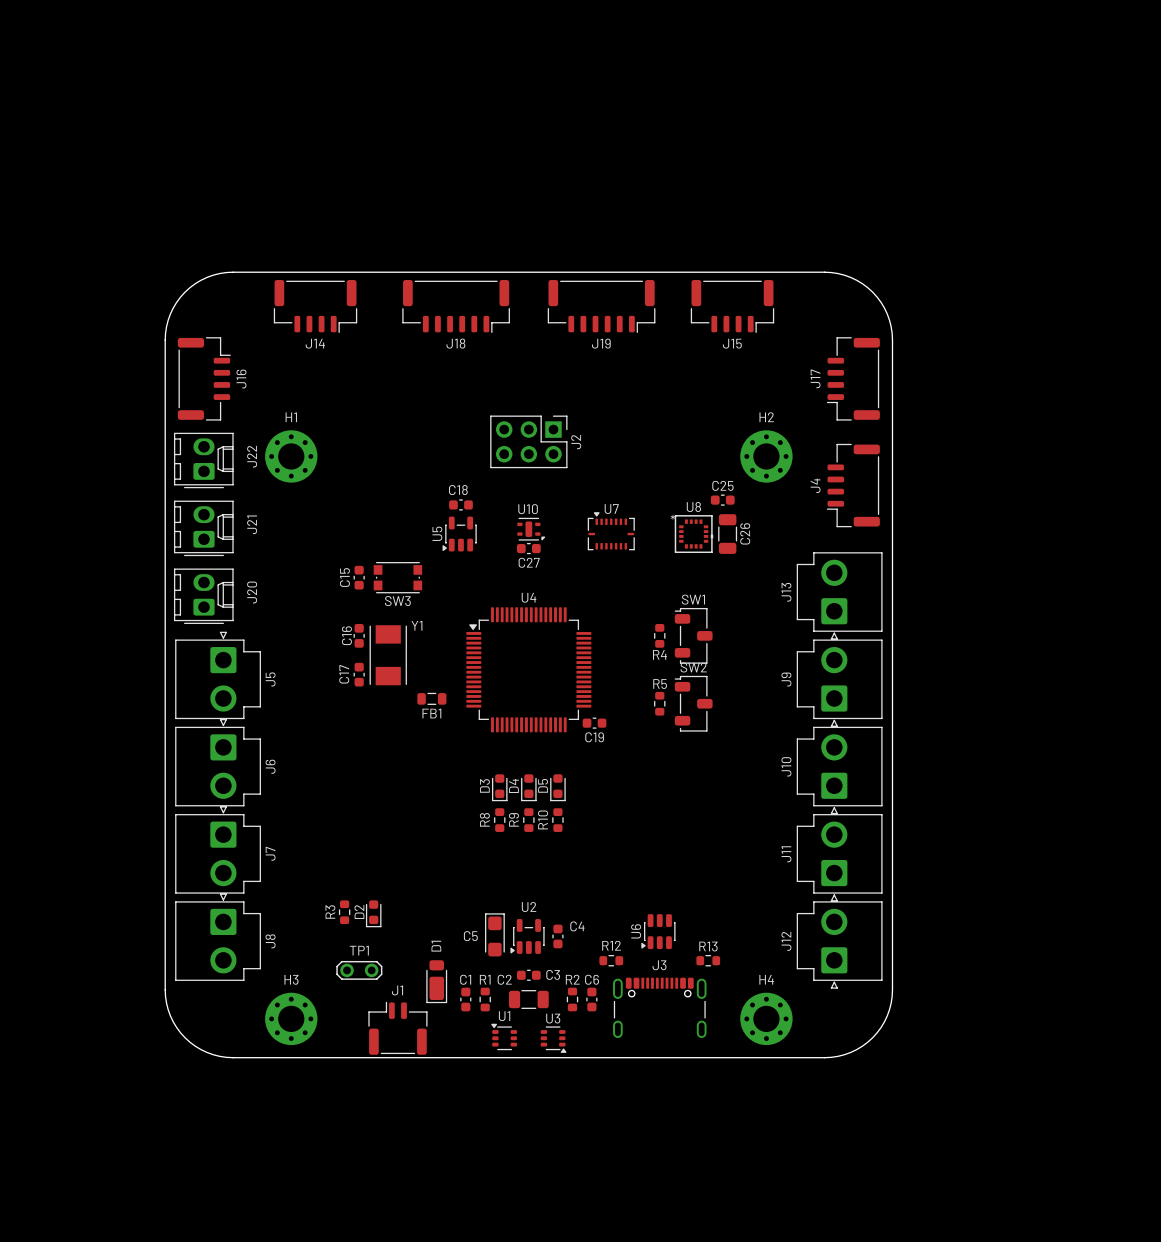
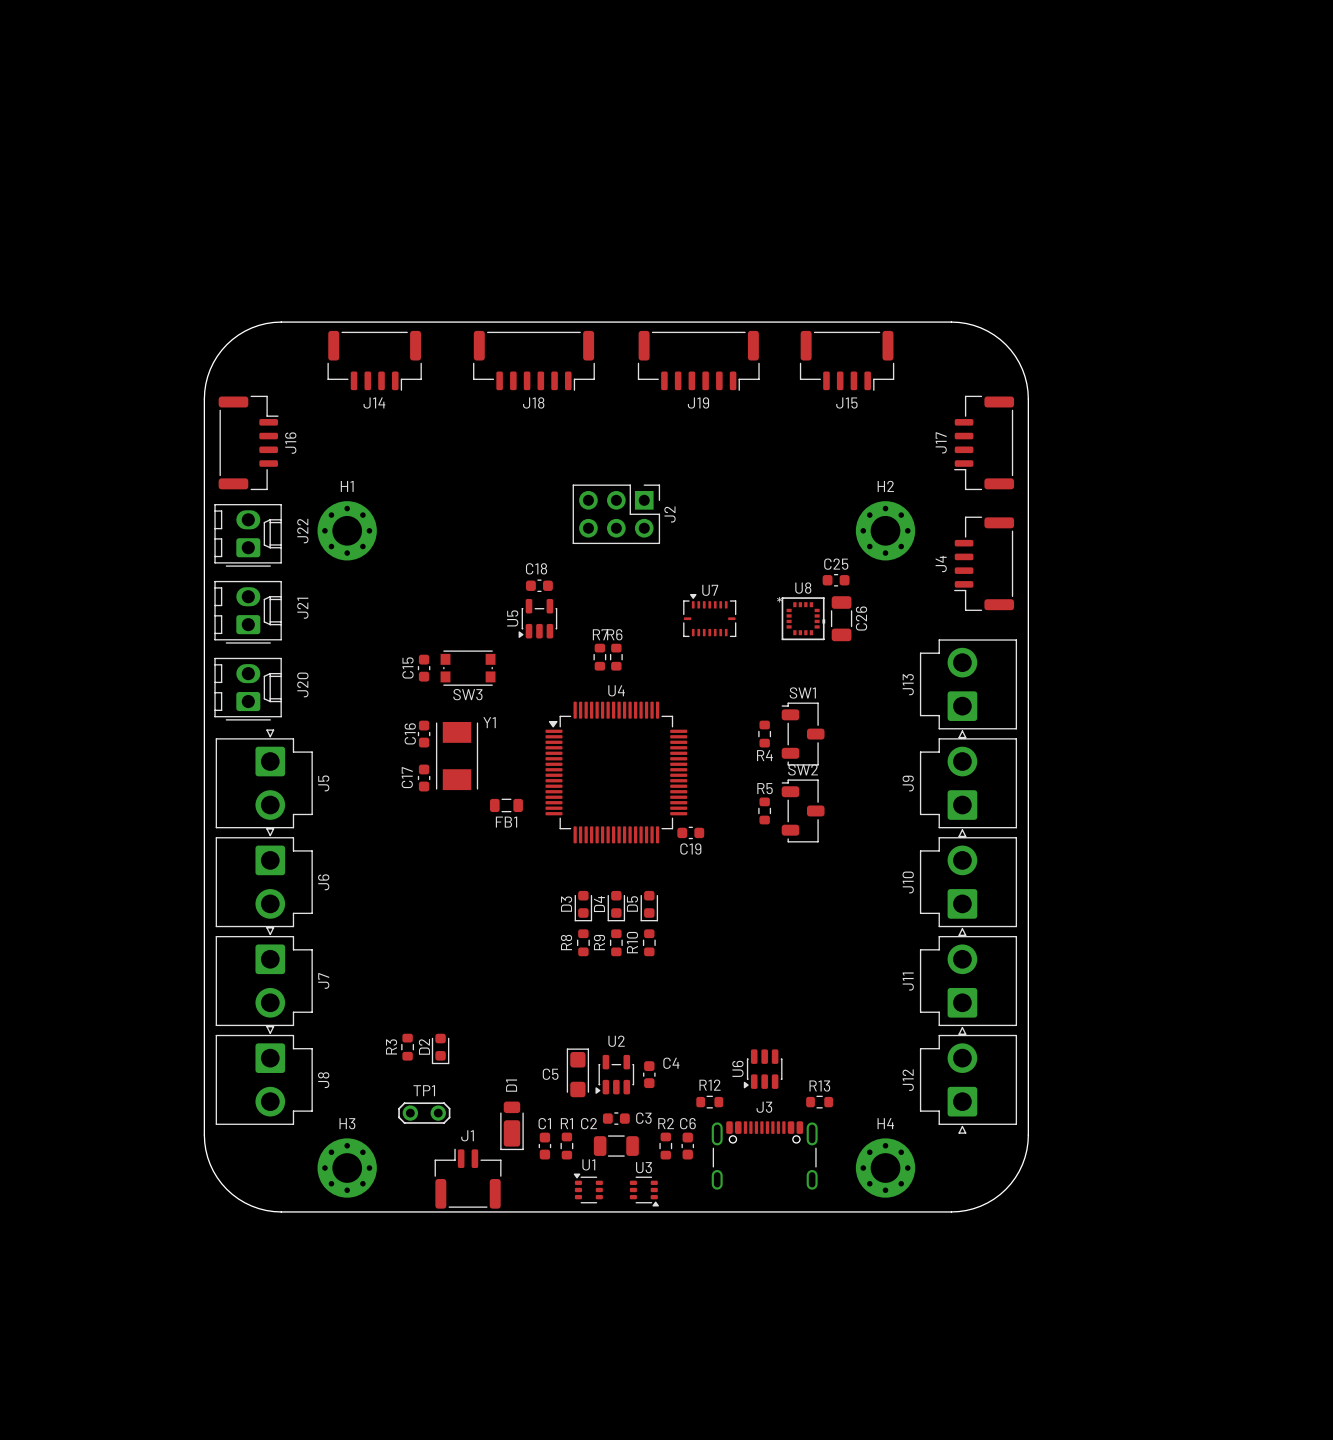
U10: (531, 529) -> none
C27: (528, 548) -> none
R7: none -> (599, 657)
R6: none -> (616, 657)

